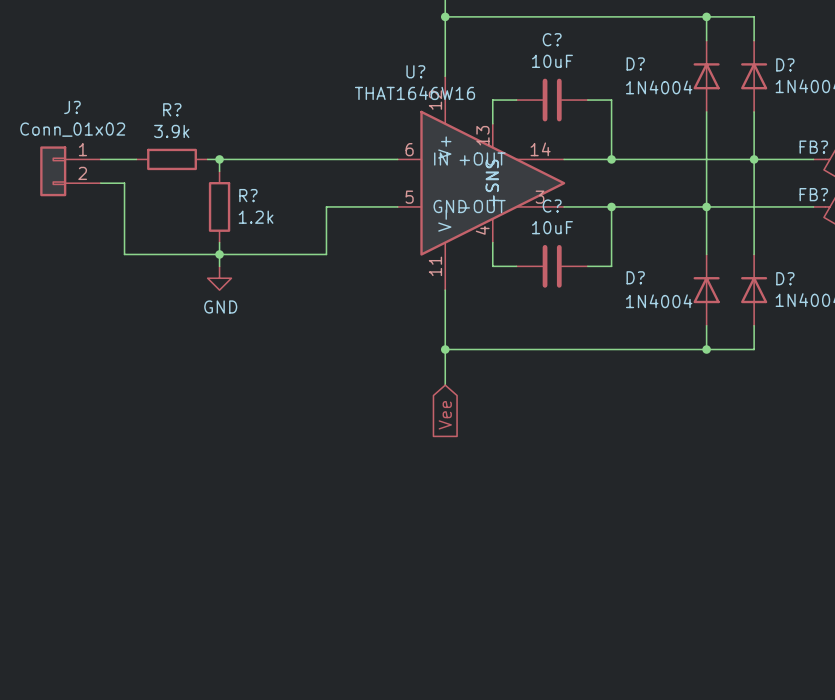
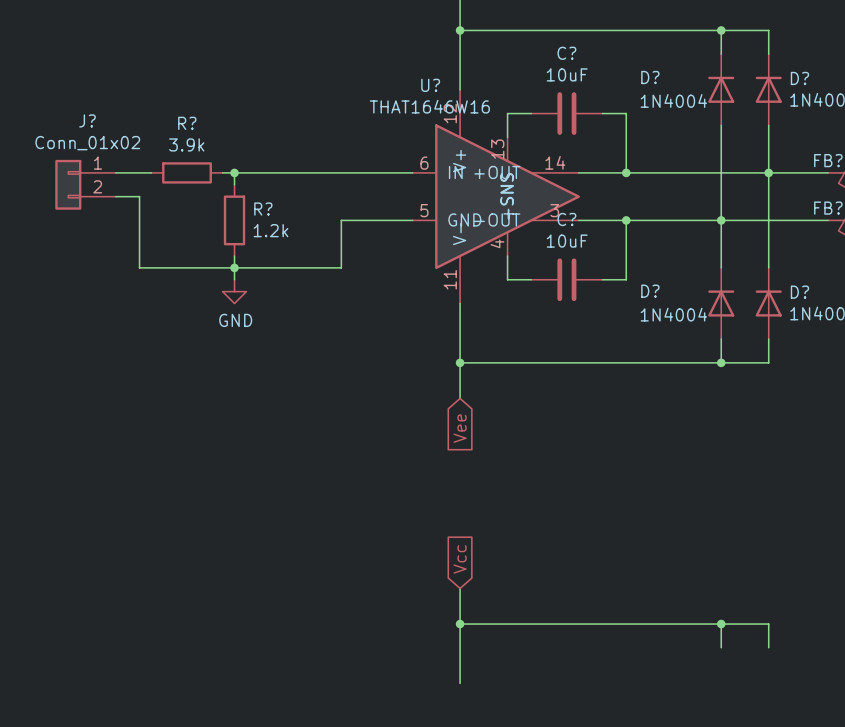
global label: none -> Vcc (460, 559)
wire: none -> (460, 588) (460, 683)
wire: none -> (460, 624) (768, 624) (768, 647)
junction: none -> (460, 624)
wire: none -> (721, 624) (721, 647)
junction: none -> (721, 624)

